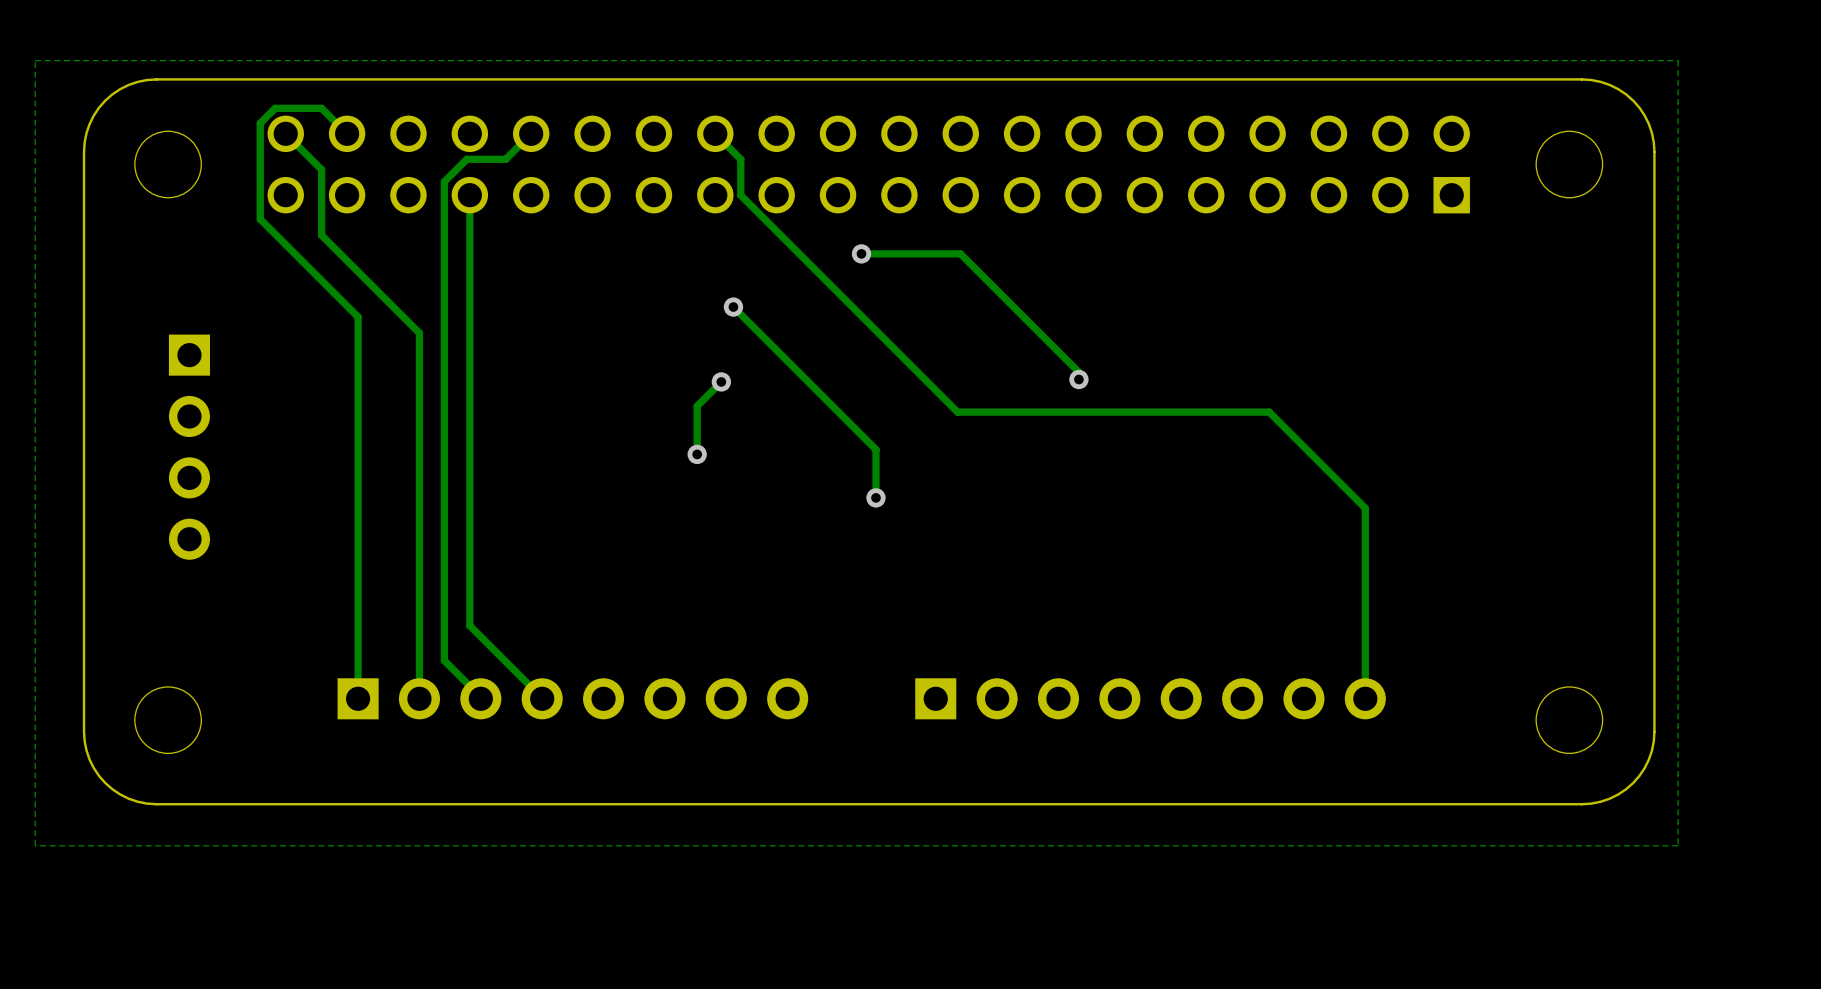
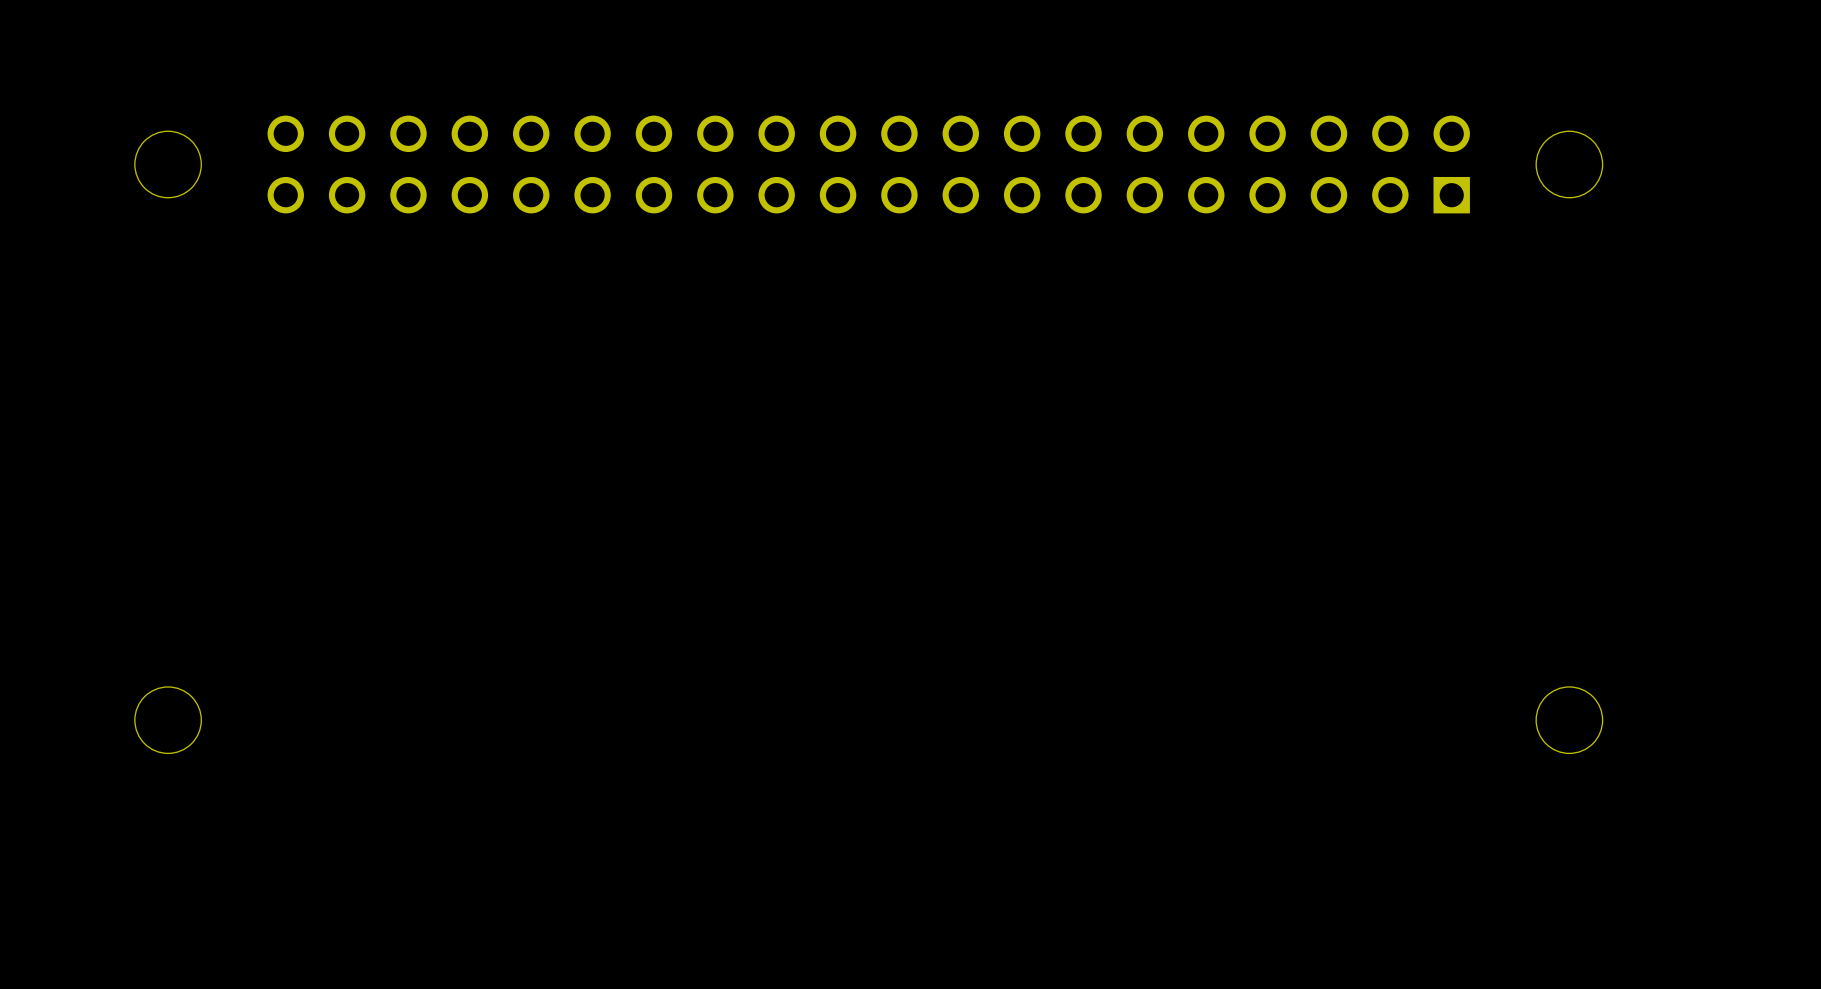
zone outline: (1678, 60) (1678, 845) (35, 845) (35, 60) (1678, 60) -> none
board edge: (1581, 79) (156, 79) (128, 84) (112, 94) (93, 115) (86, 133) (84, 151) (84, 731) (89, 759) (99, 775) (112, 789) (128, 798) (156, 804) (1581, 804) (1609, 798) (1626, 789) (1639, 775) (1648, 759) (1653, 741) (1654, 151) (1648, 124) (1633, 100) (1609, 84) (1581, 79) -> none
track: (285, 133) (321, 169) (321, 235) (419, 333) (419, 698) -> none
track: (347, 133) (321, 108) (275, 108) (260, 123) (260, 219) (358, 317) (358, 698) -> none
track: (531, 133) (505, 159) (466, 159) (444, 181) (444, 660) (480, 698) -> none
track: (715, 133) (740, 159) (740, 195) (957, 412) (1269, 412) (1365, 508) (1365, 691) -> none
track: (469, 195) (469, 625) (542, 698) -> none
track: (861, 253) (960, 253) (1078, 372) (1078, 379) -> none
via: (861, 253) -> none
track: (733, 307) (875, 449) (875, 497) -> none
via: (733, 307) -> none
via: (1078, 379) -> none
track: (721, 381) (697, 406) (697, 454) -> none
via: (721, 381) -> none
part: (189, 447) -> none
via: (697, 454) -> none
via: (875, 497) -> none
part: (572, 698) -> none
part: (1150, 698) -> none

